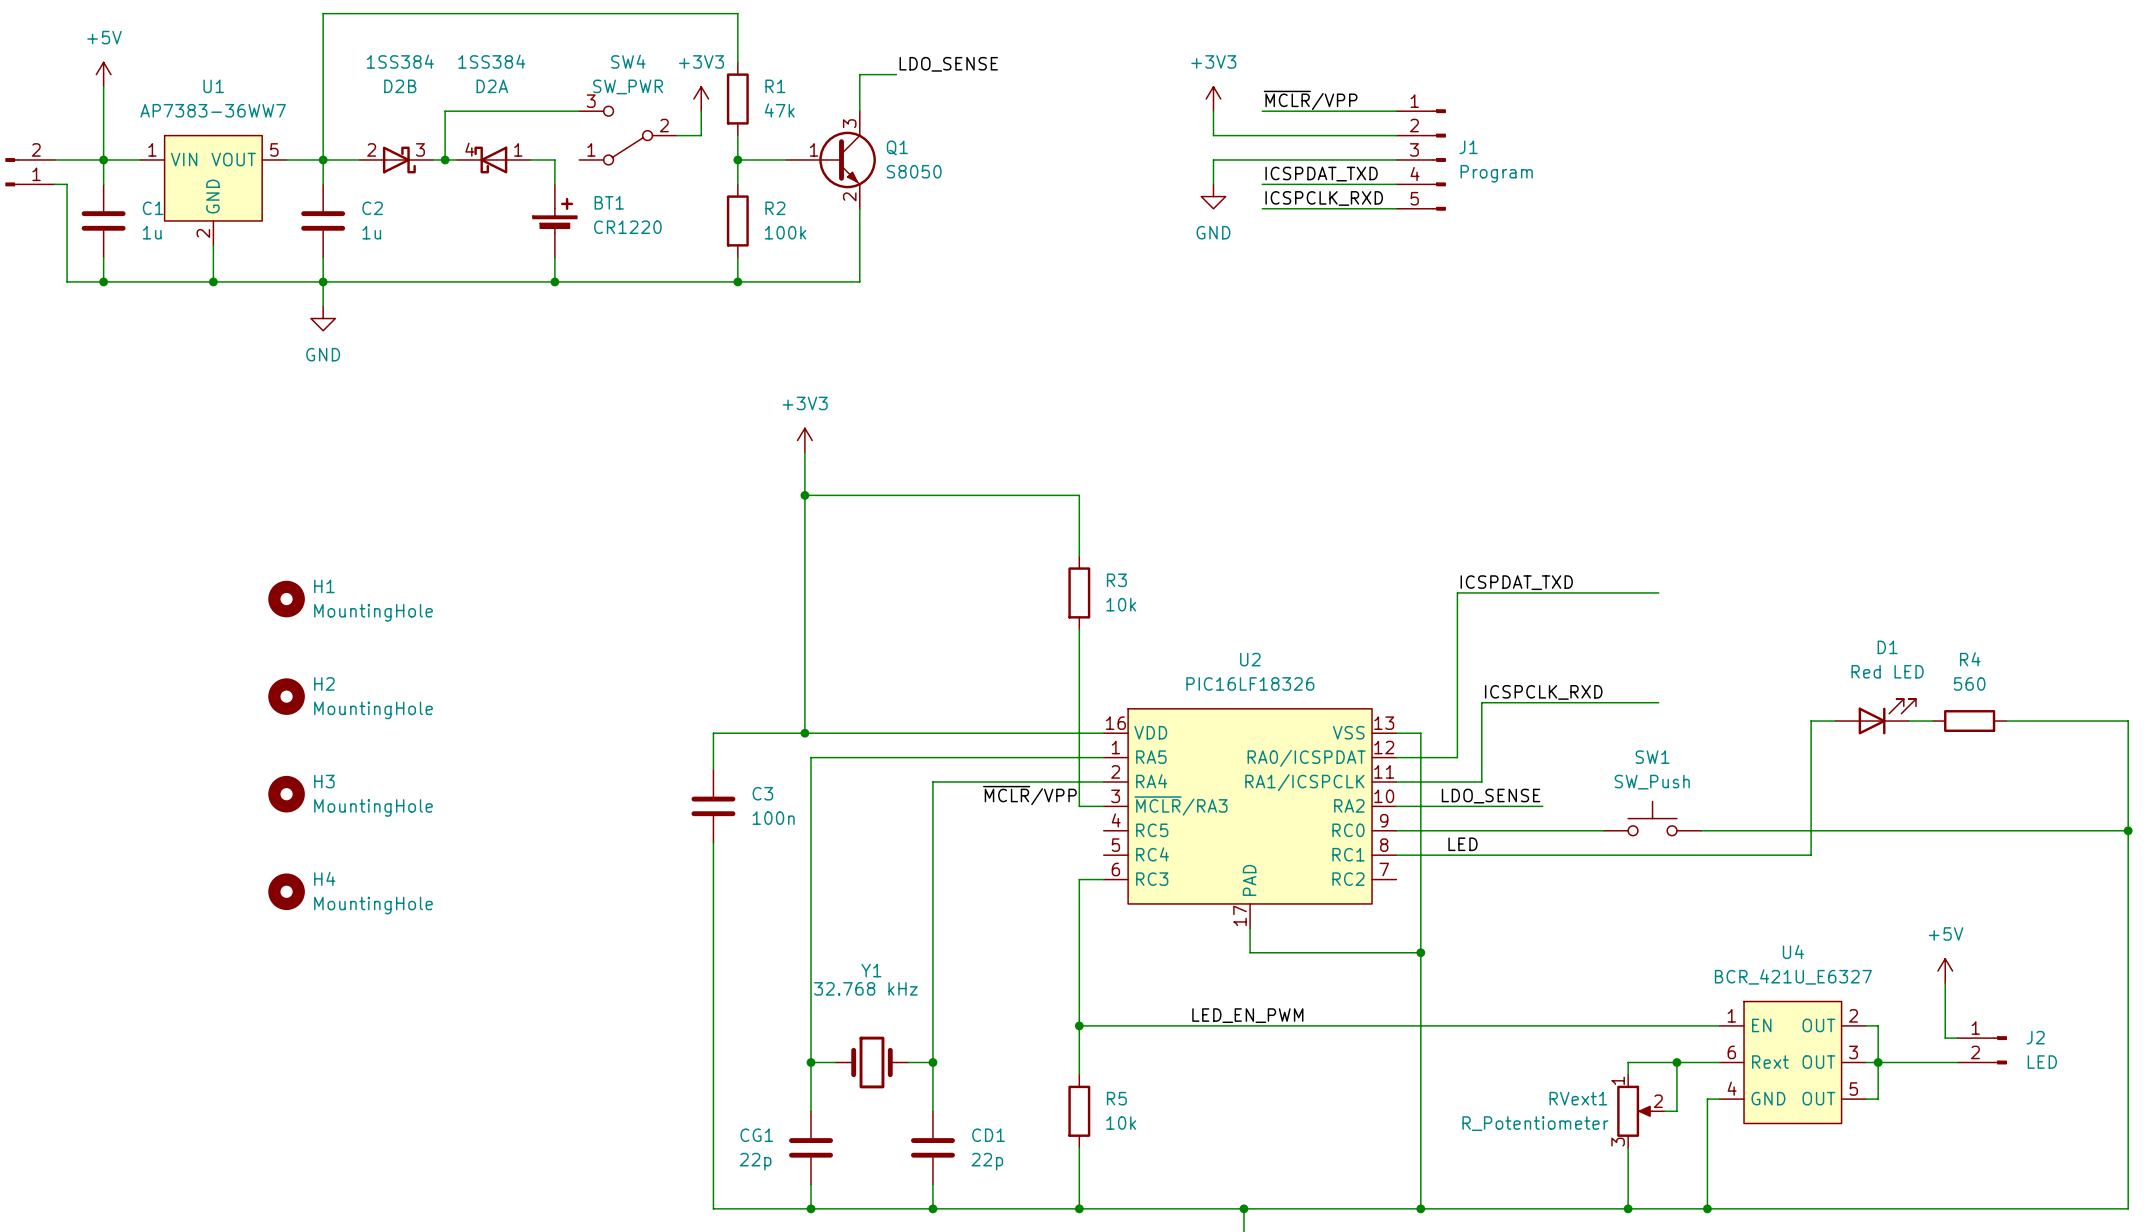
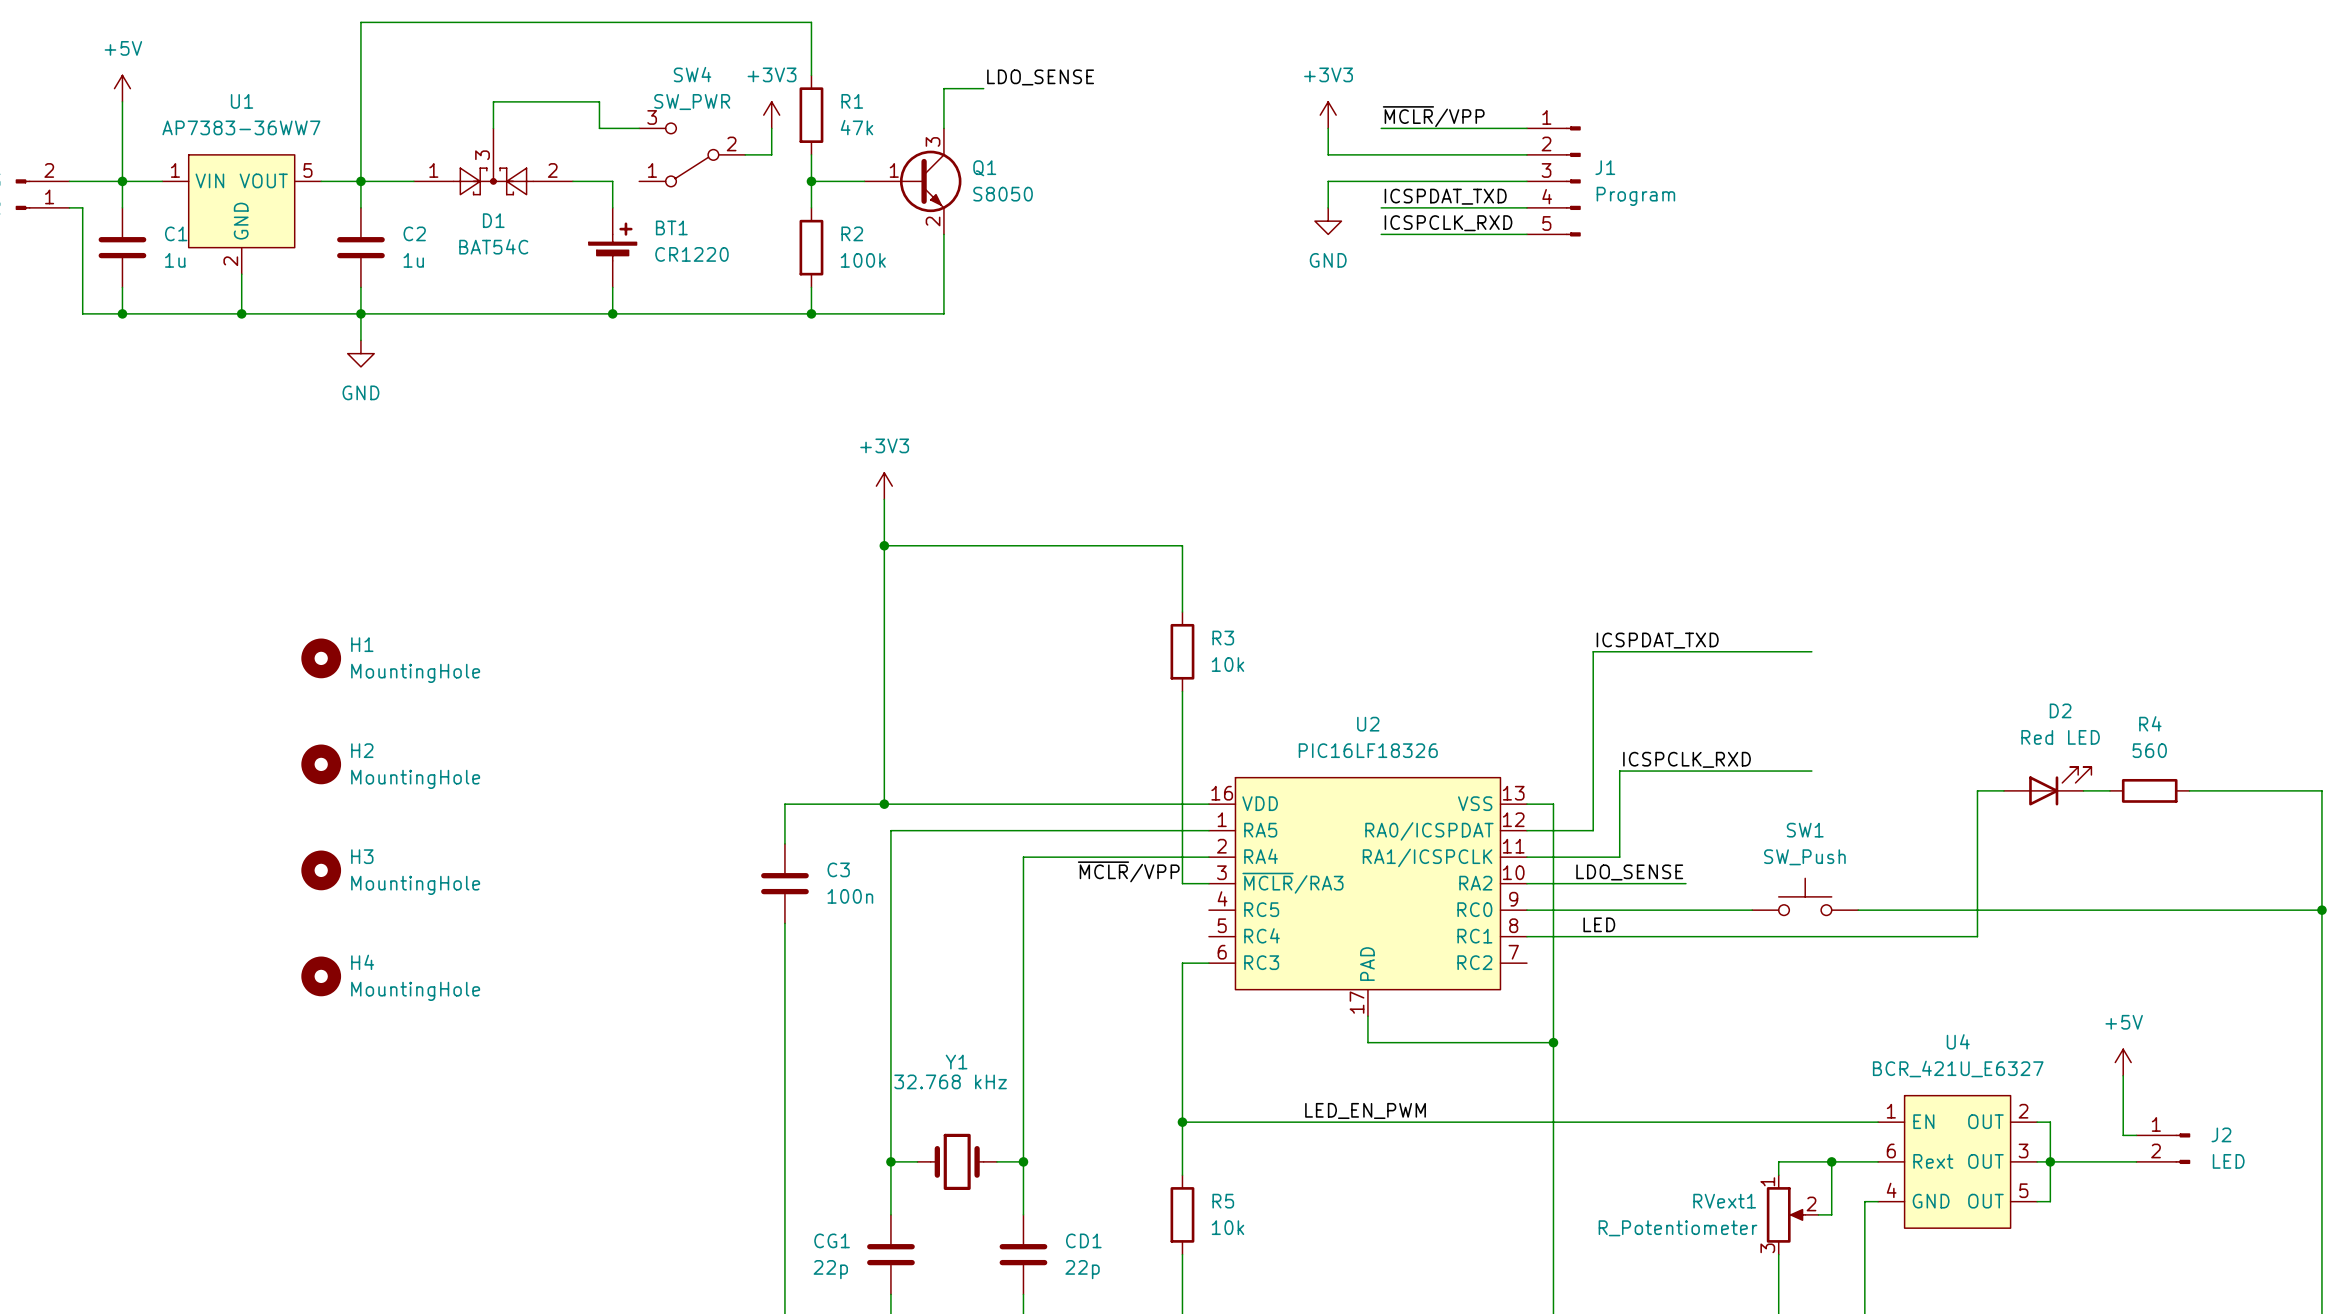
wire: (542, 111) (445, 111) (445, 159) -> (599, 128) (599, 101) (493, 101) (493, 128)
D1: none -> BAT54C (493, 161)
D2B: 1SS384 (396, 159) -> none
junction: (445, 159) -> none
D2A: 1SS384 (493, 159) -> none
D1 name: D1 (1887, 647) -> D2 (2060, 710)

